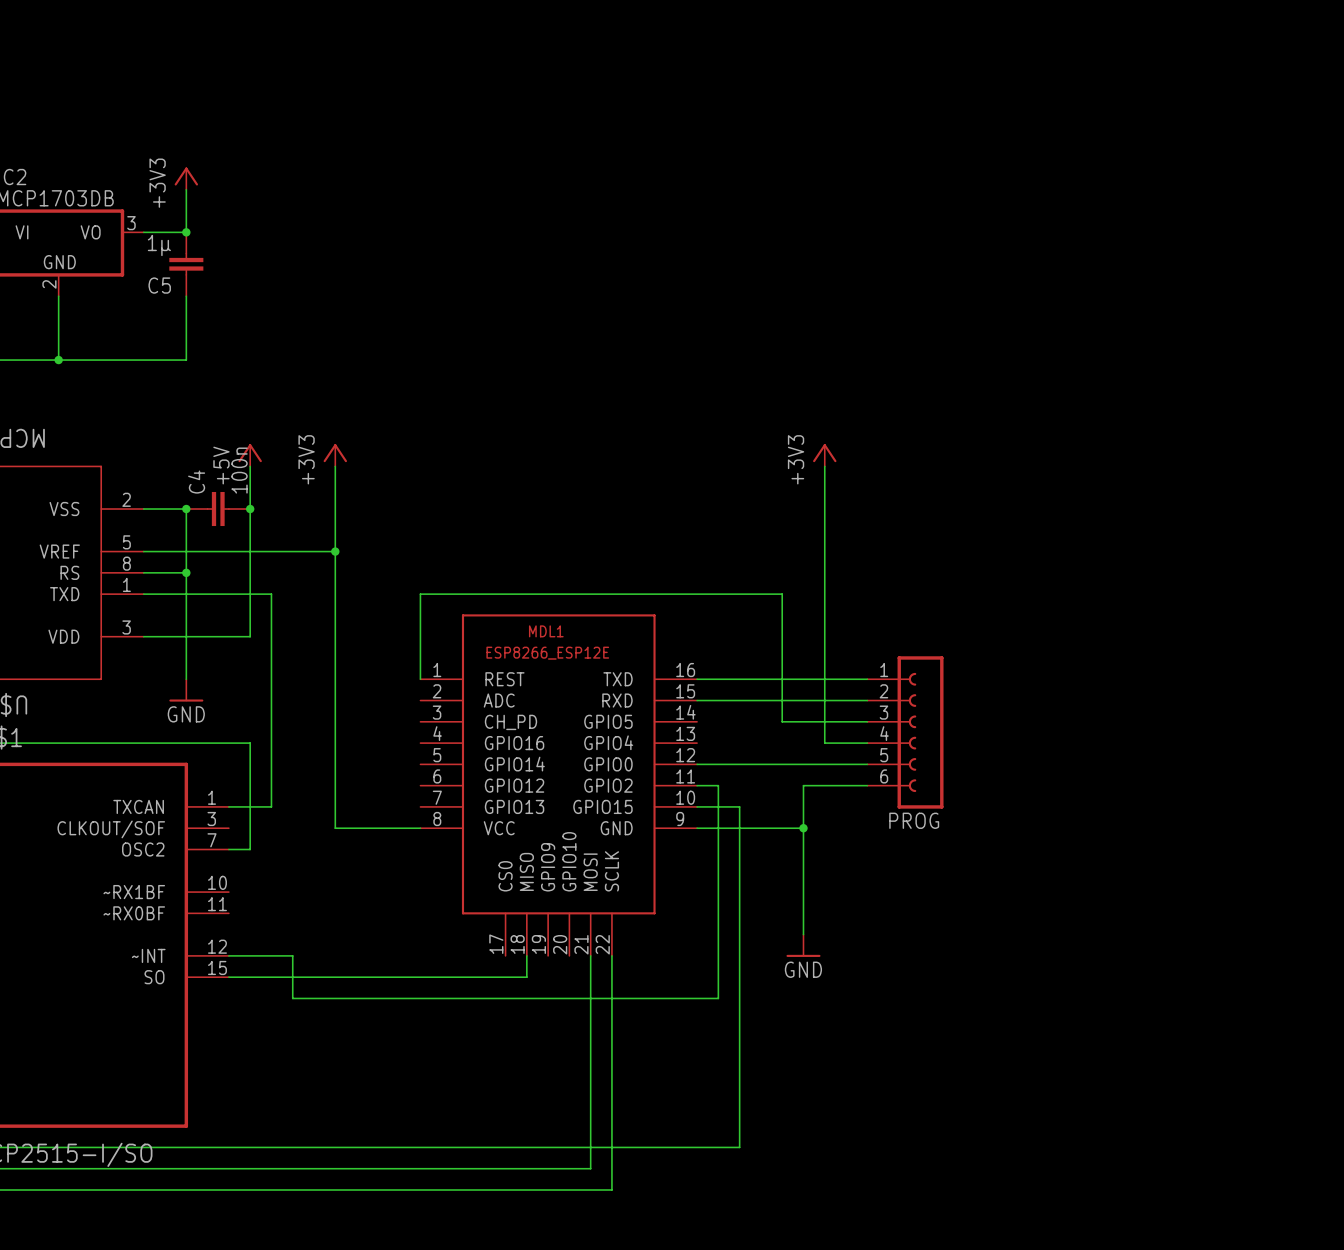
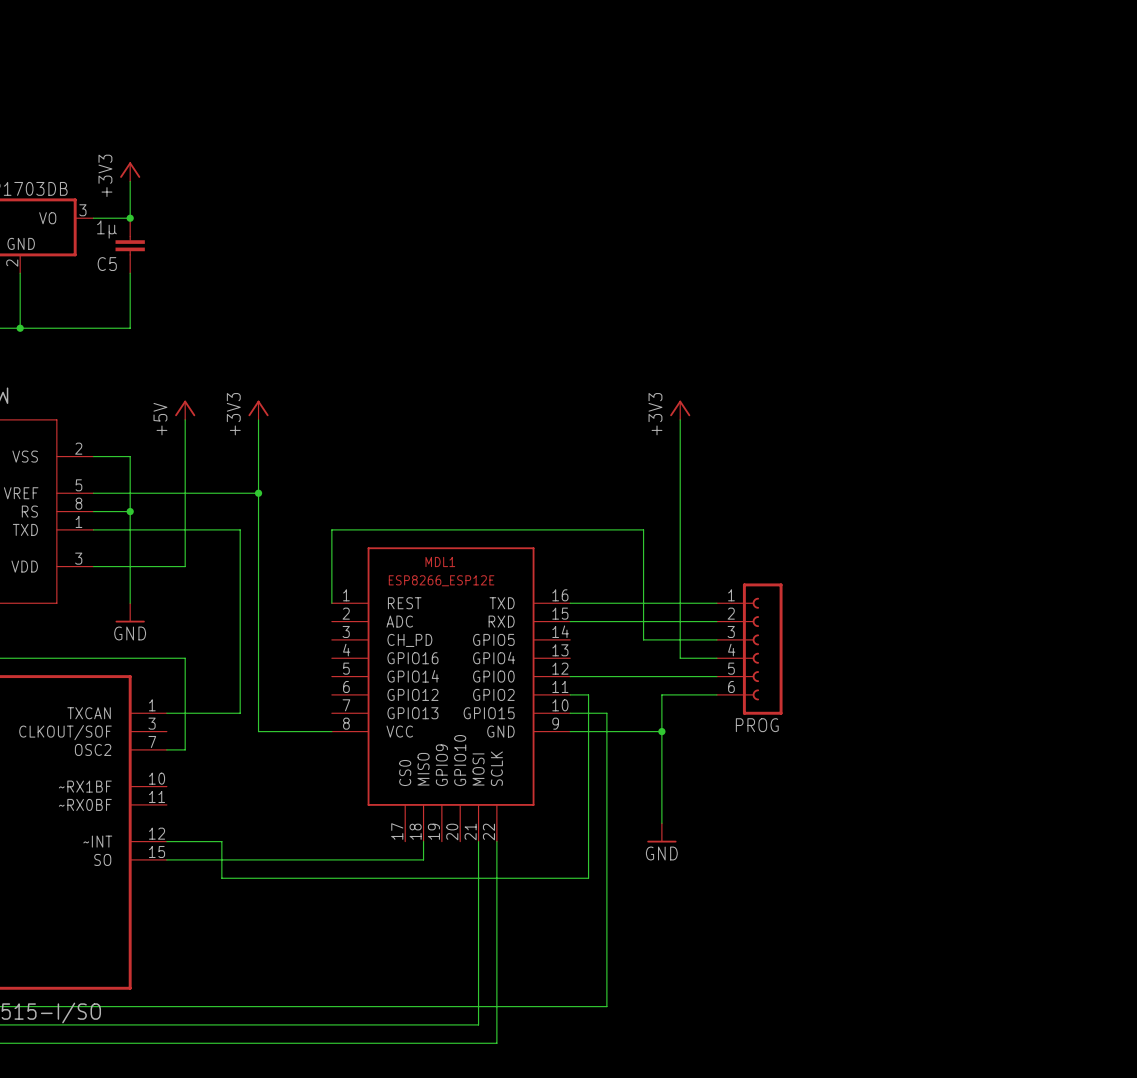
junction: (186, 509) -> none
C4: 100n (218, 509) -> none
junction: (250, 509) -> none
wire: (271, 594) (271, 806) -> (203, 529) (240, 529) (240, 713) (203, 713)

